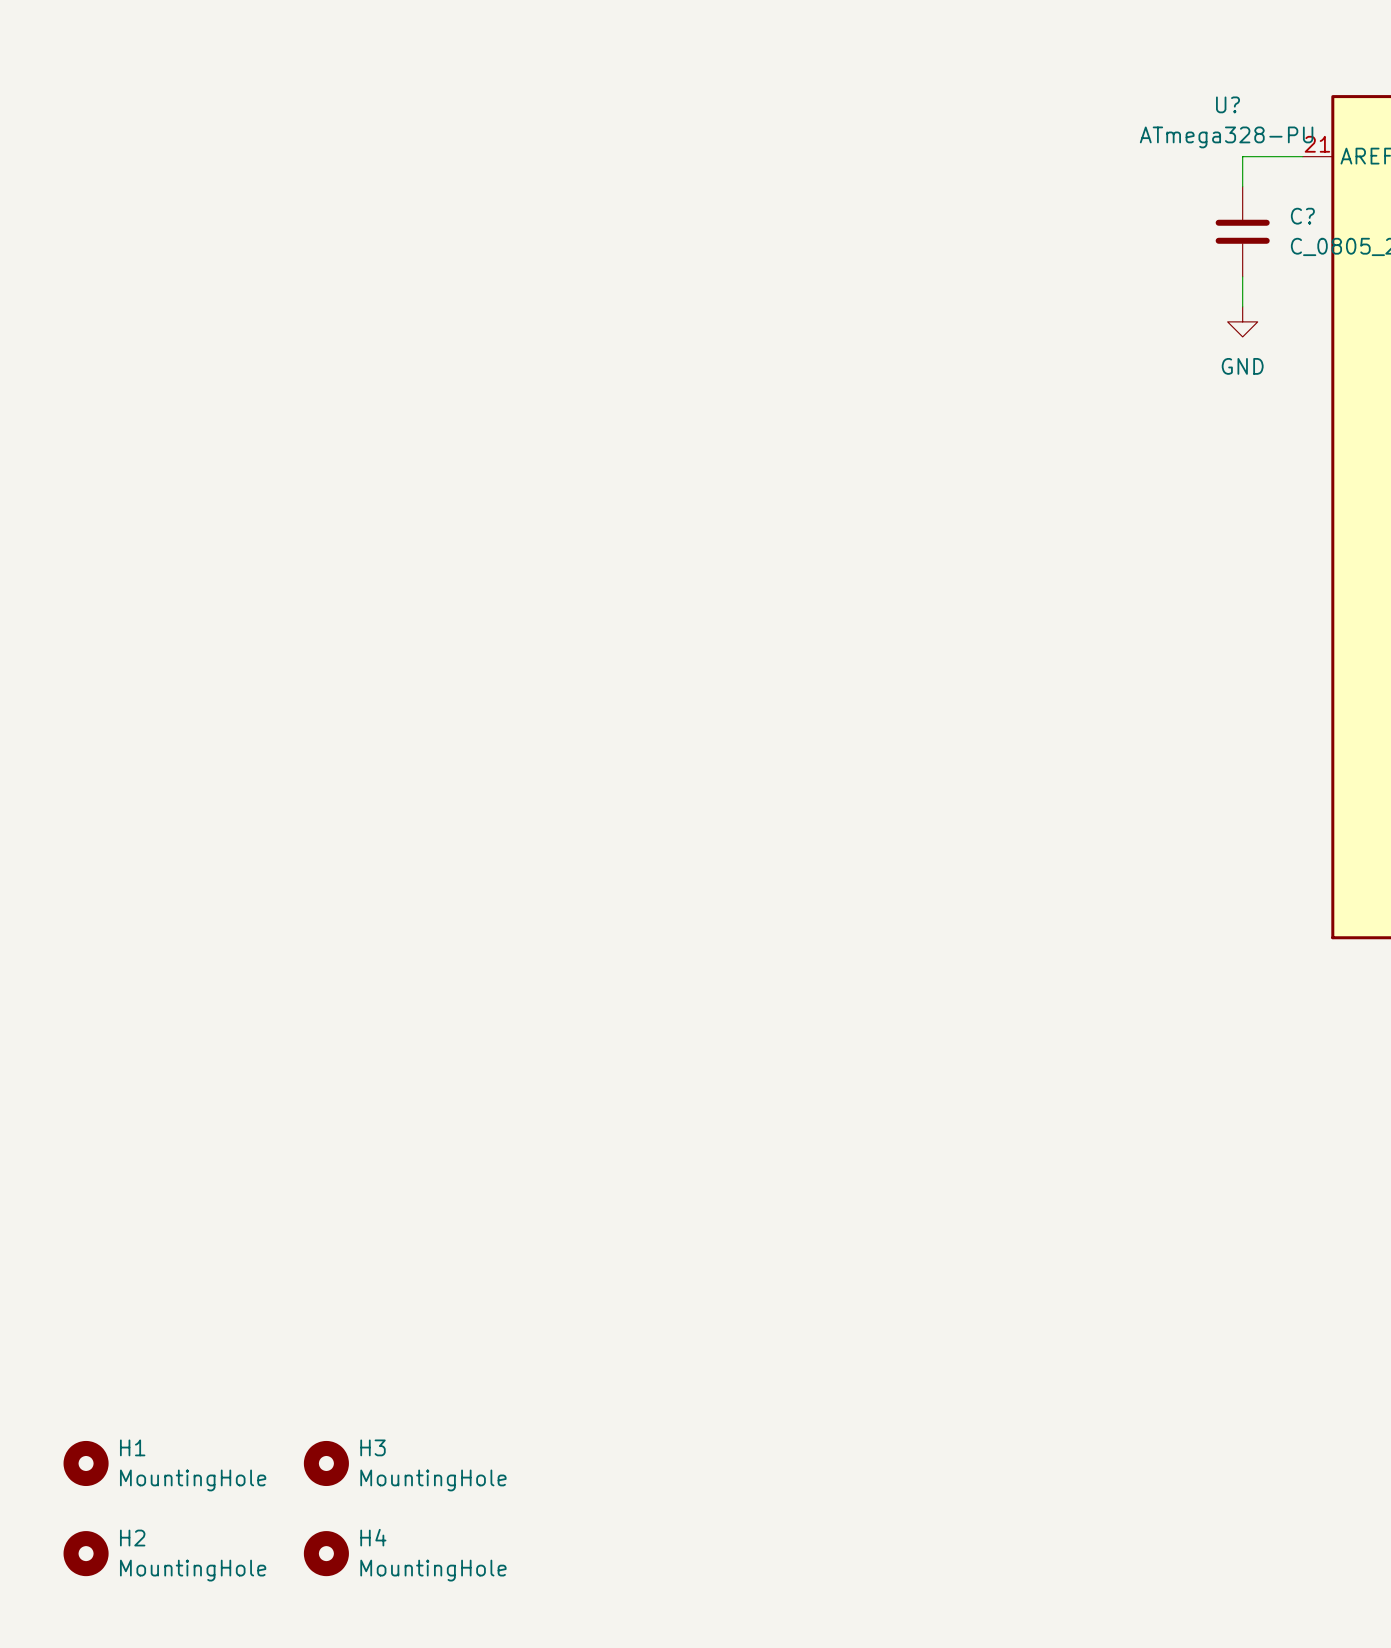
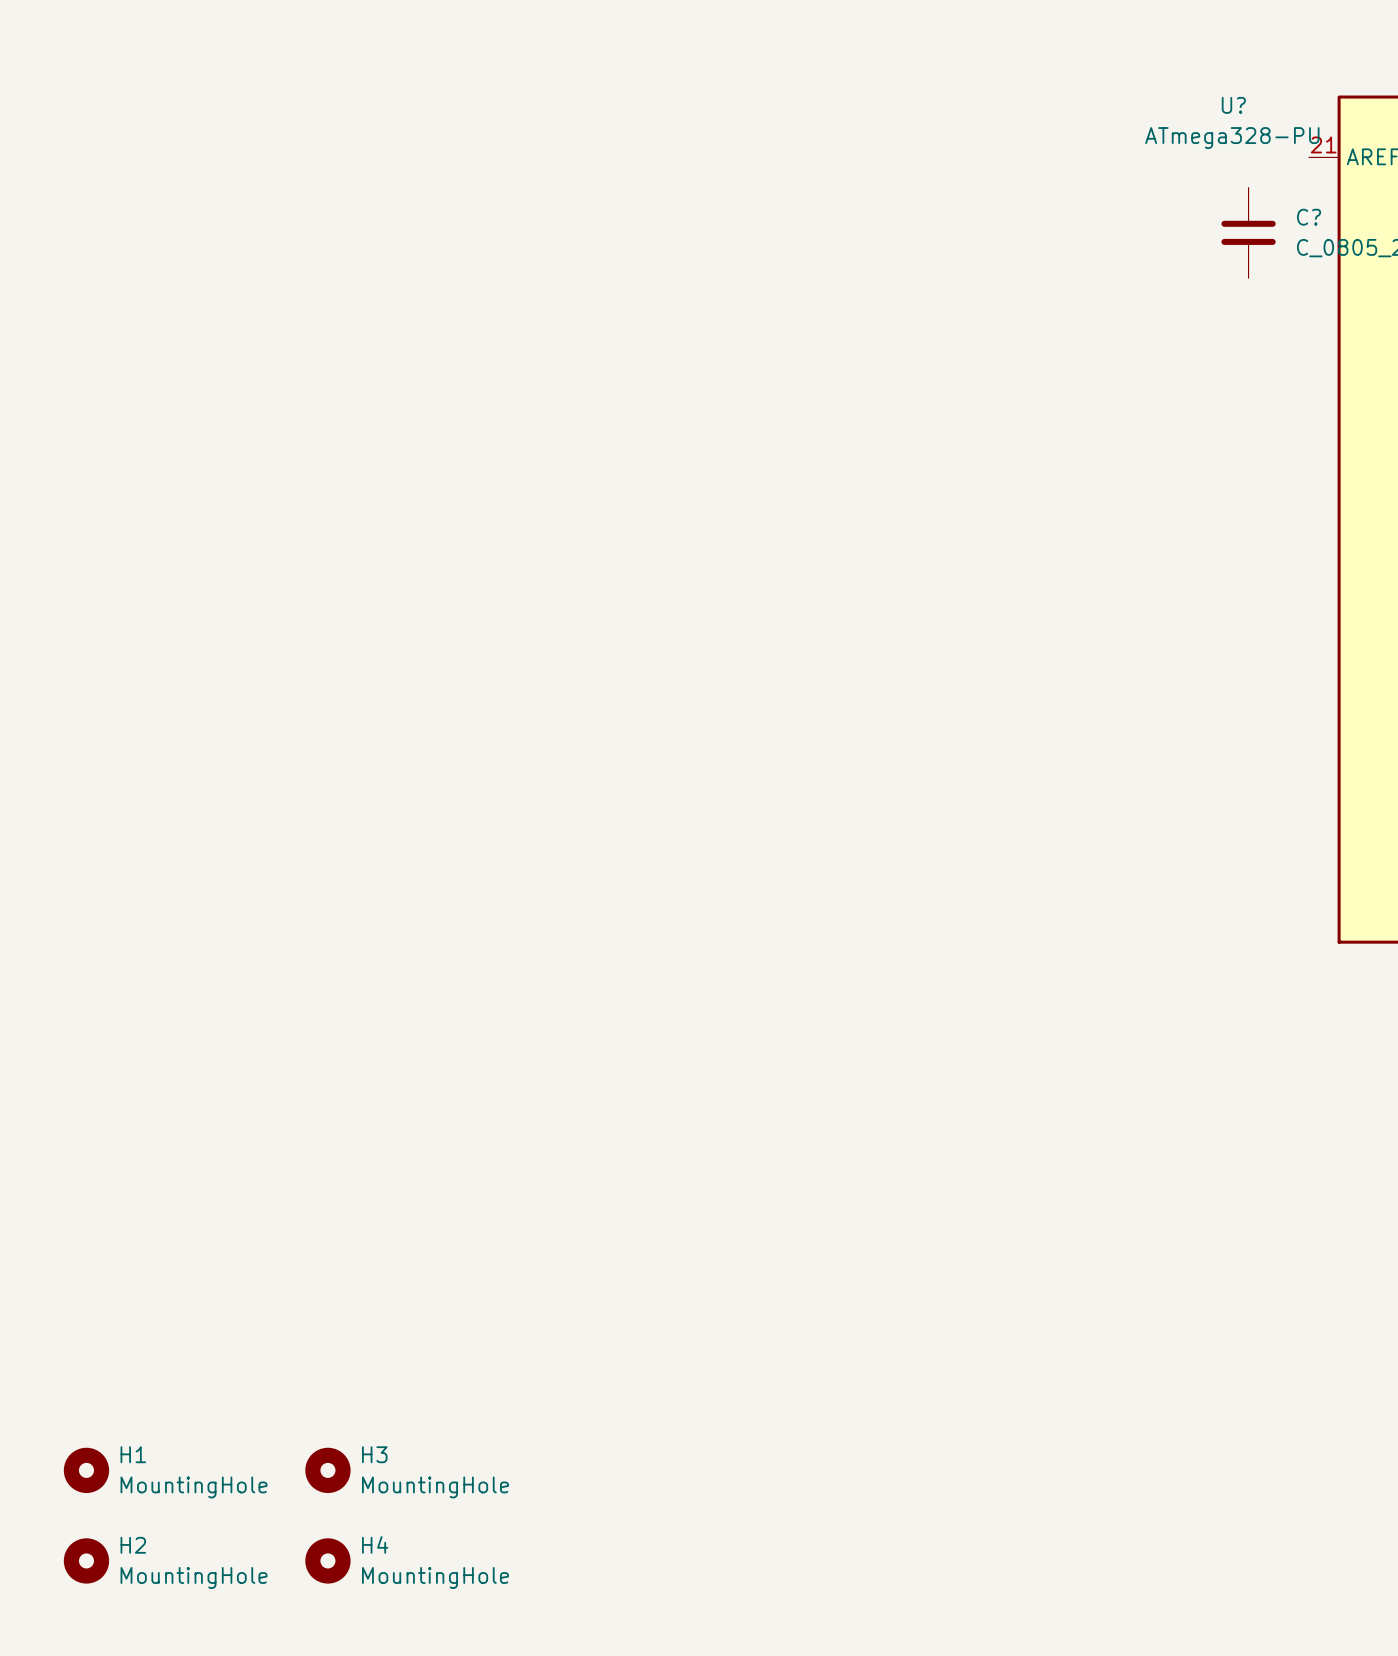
wire: (1302, 156) (1242, 156) (1242, 186) -> none
wire: (1242, 276) (1242, 306) -> none
power symbol: GND (1242, 321) -> none

